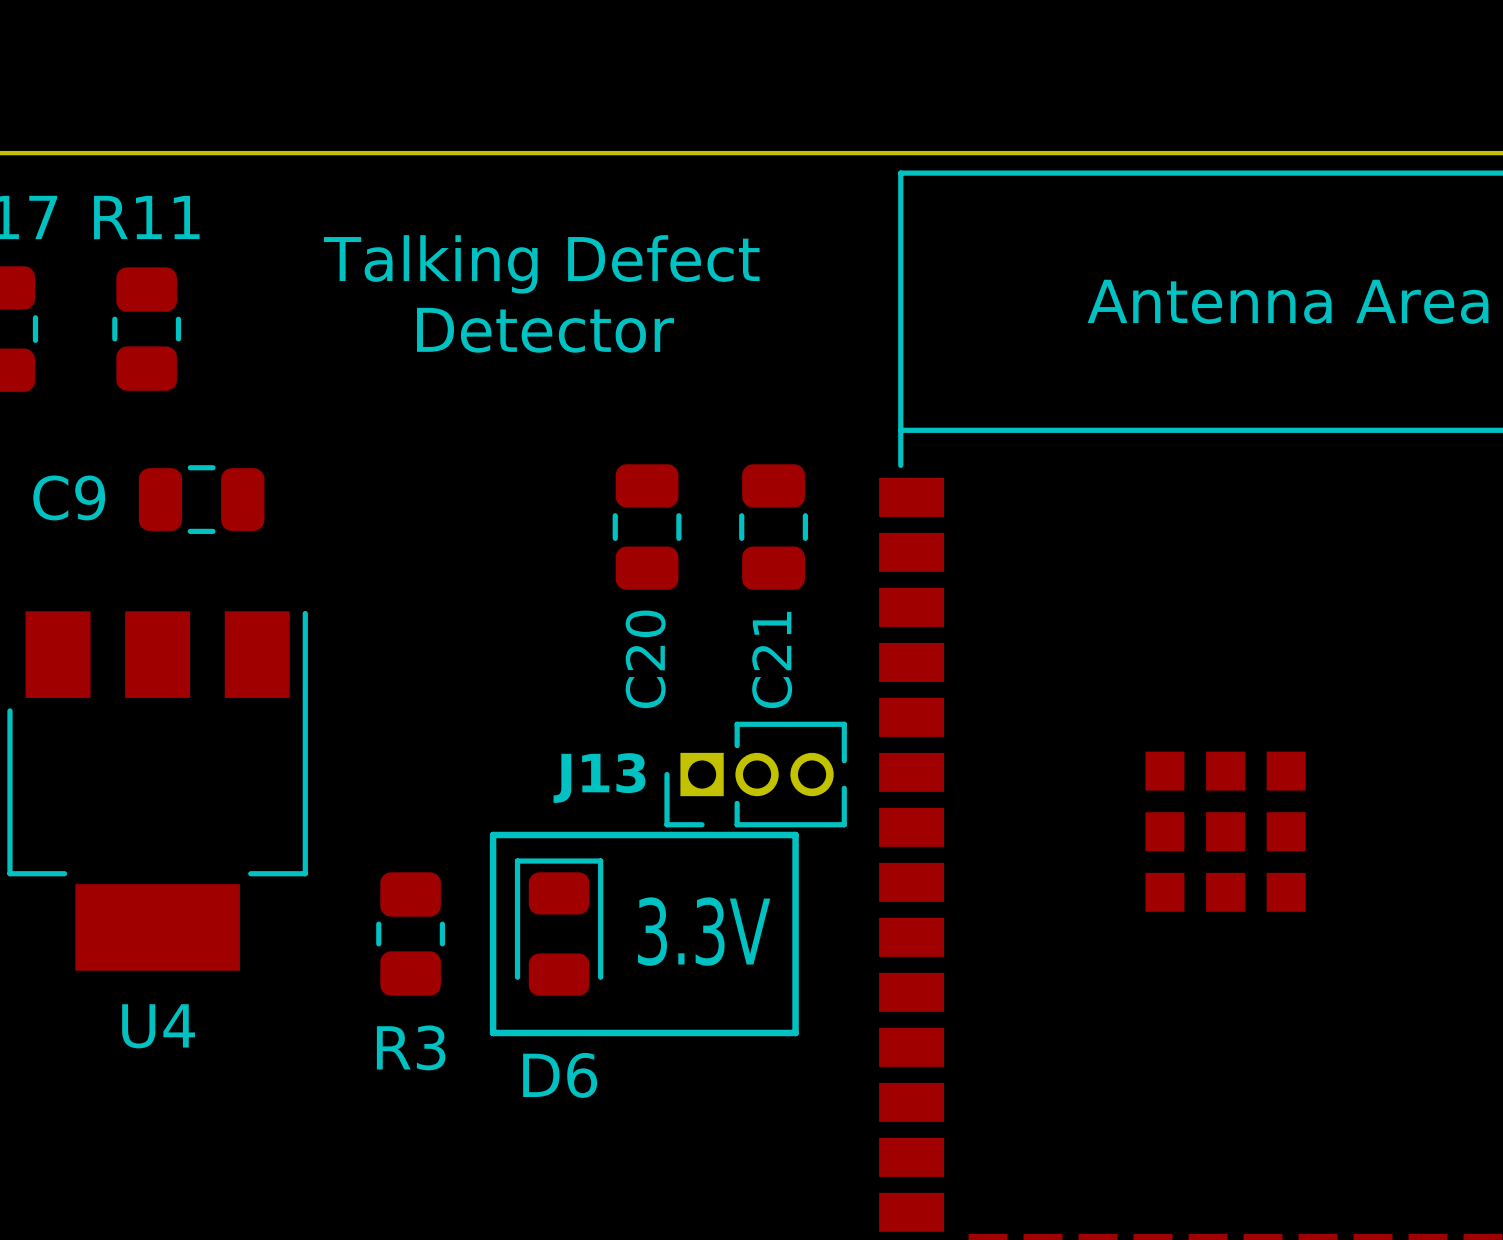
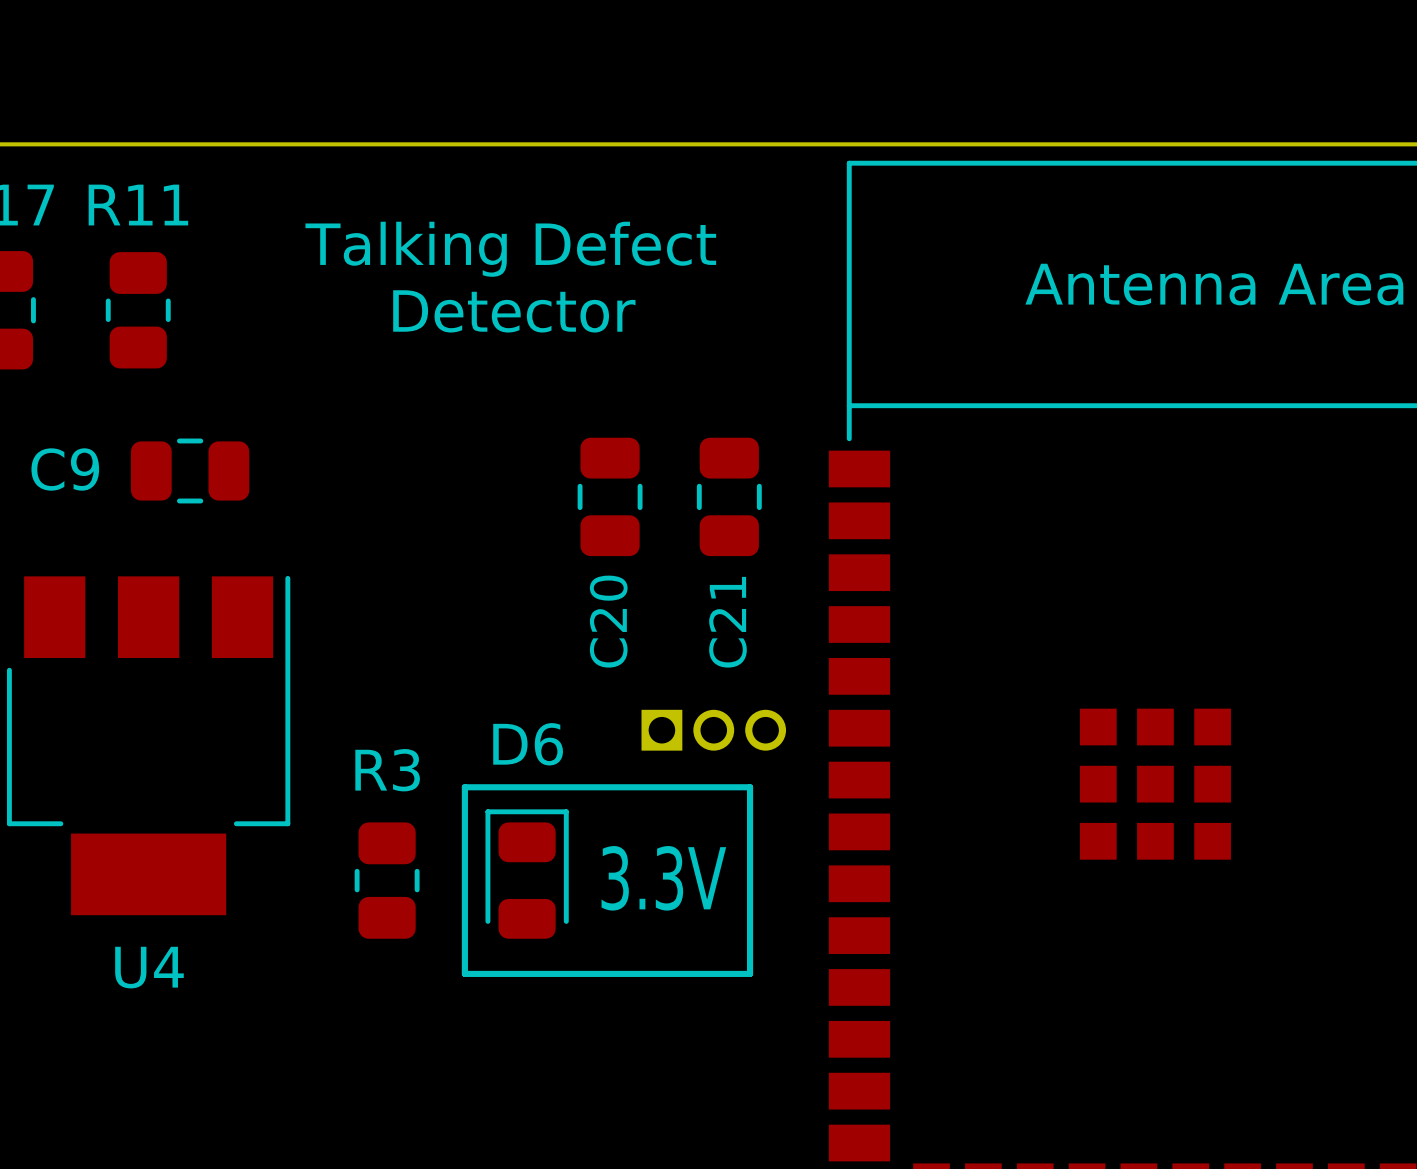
J13: (755, 774) -> none
R3 name position: R3 (411, 1047) -> R3 (387, 770)
D6 name position: D6 (560, 1075) -> D6 (528, 744)

